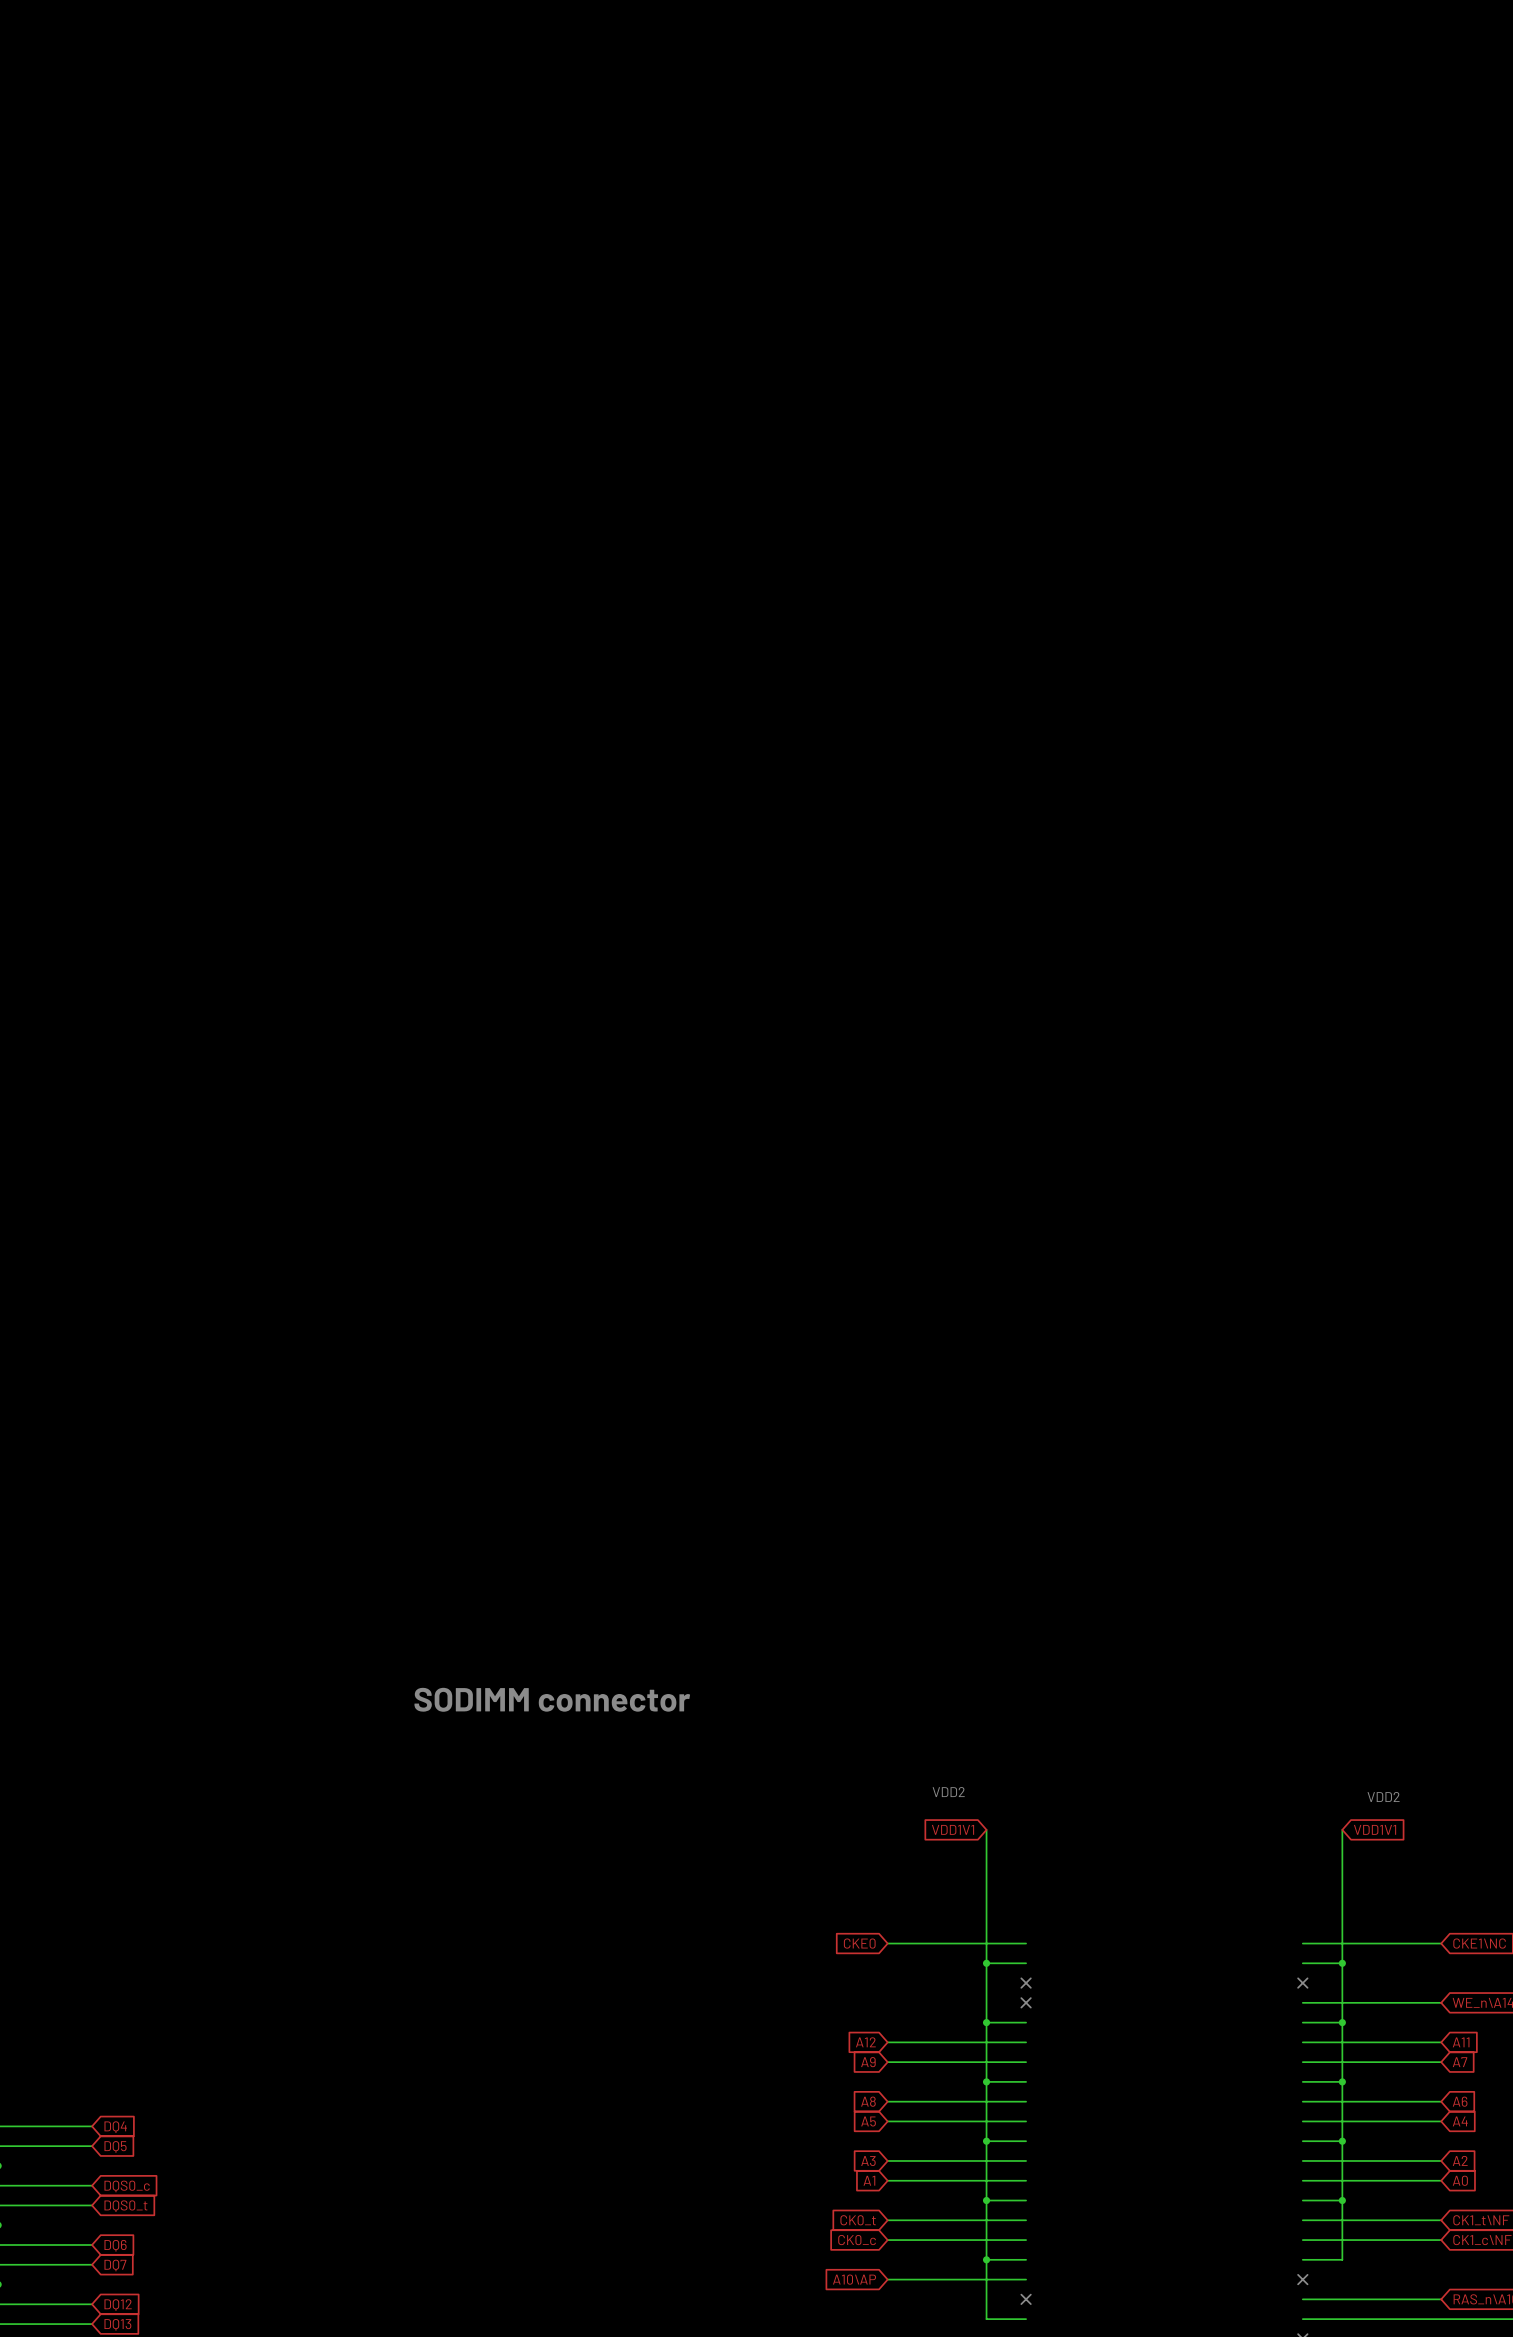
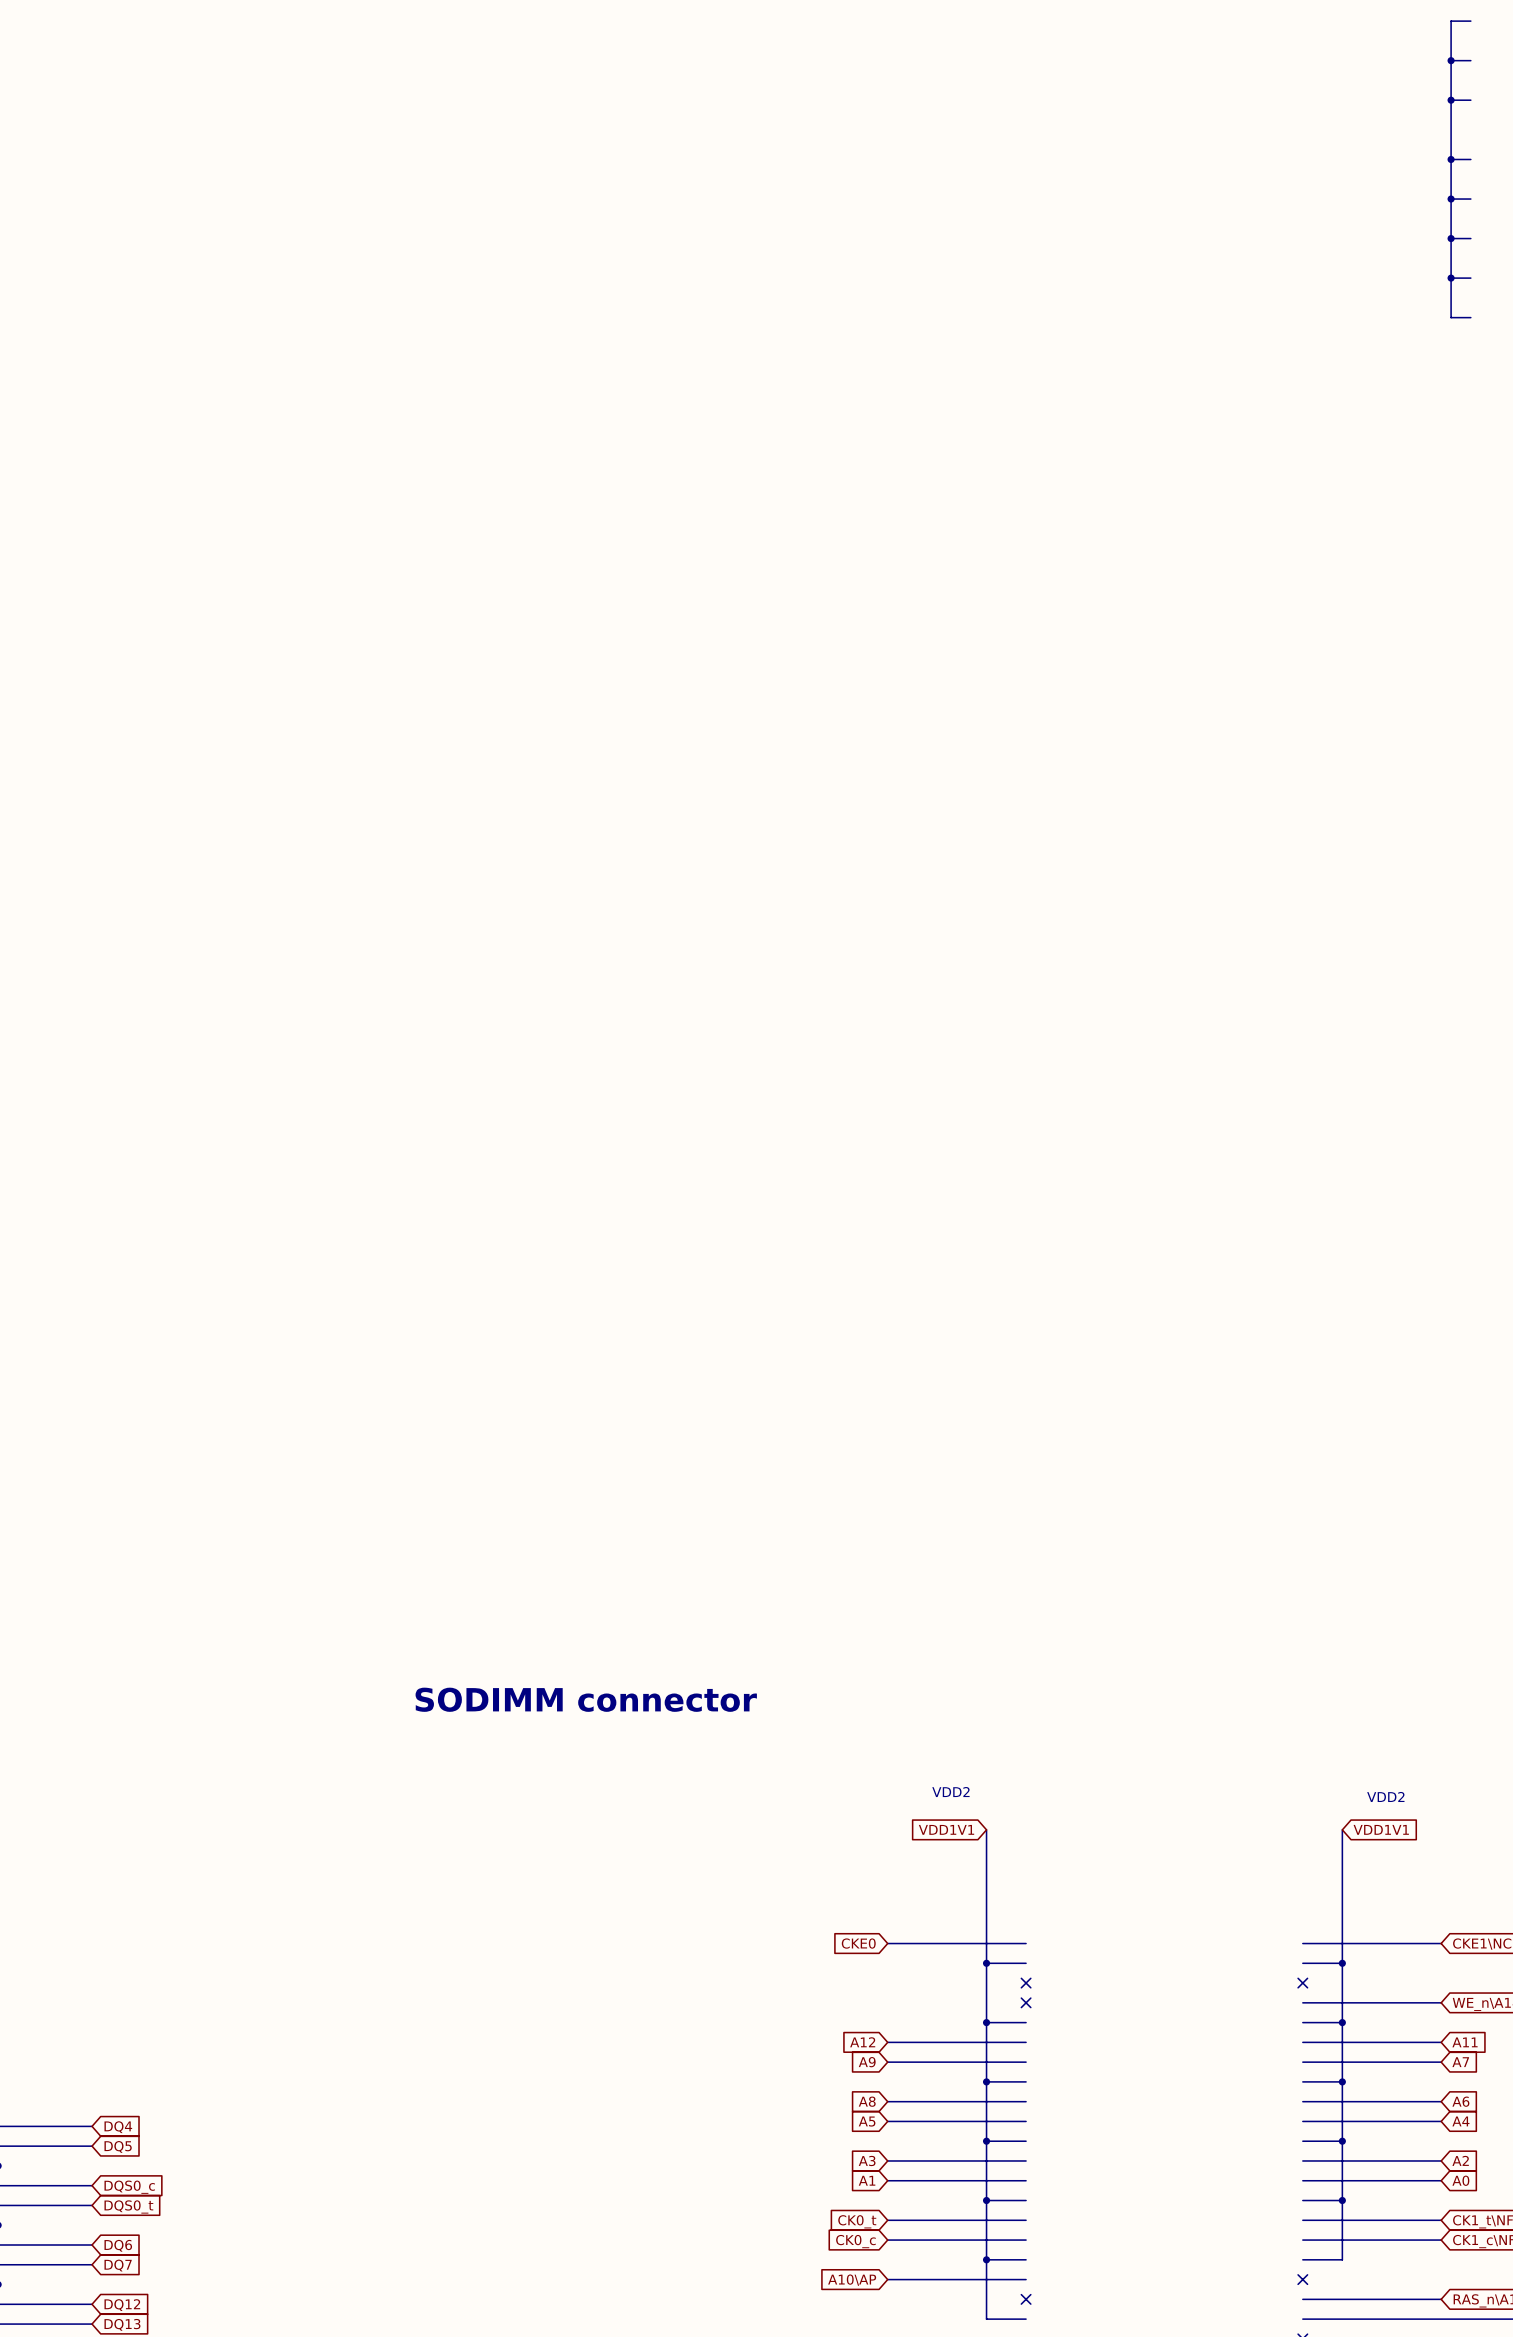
wire: none -> (1470, 21) (1451, 21) (1451, 317) (1470, 317)
wire: none -> (1451, 60) (1470, 60)
junction: none -> (1451, 60)
wire: none -> (1451, 100) (1470, 100)
junction: none -> (1451, 100)
wire: none -> (1451, 159) (1470, 159)
junction: none -> (1451, 159)
wire: none -> (1451, 199) (1470, 199)
junction: none -> (1451, 199)
wire: none -> (1451, 238) (1470, 238)
junction: none -> (1451, 238)
wire: none -> (1451, 278) (1470, 278)
junction: none -> (1451, 278)

